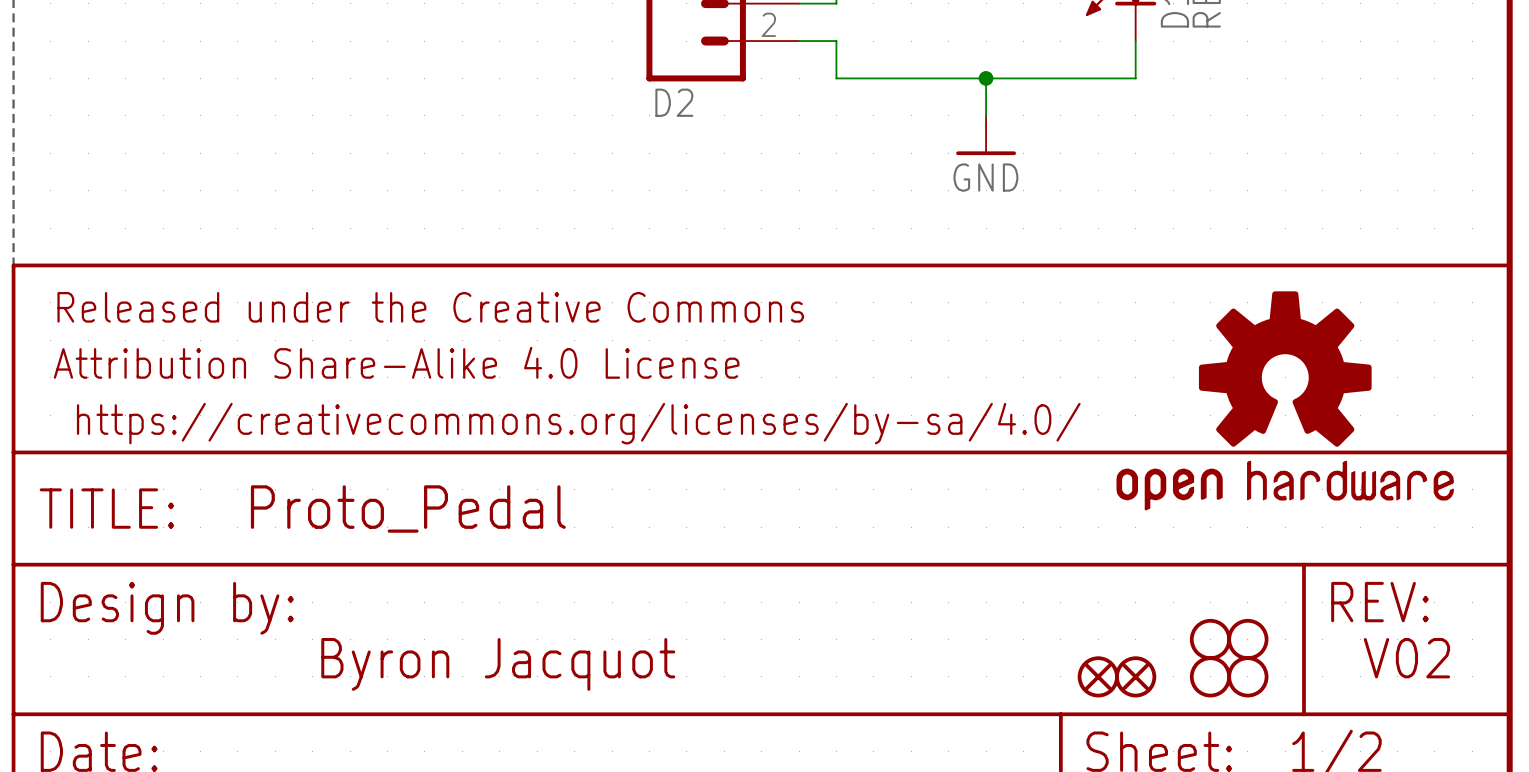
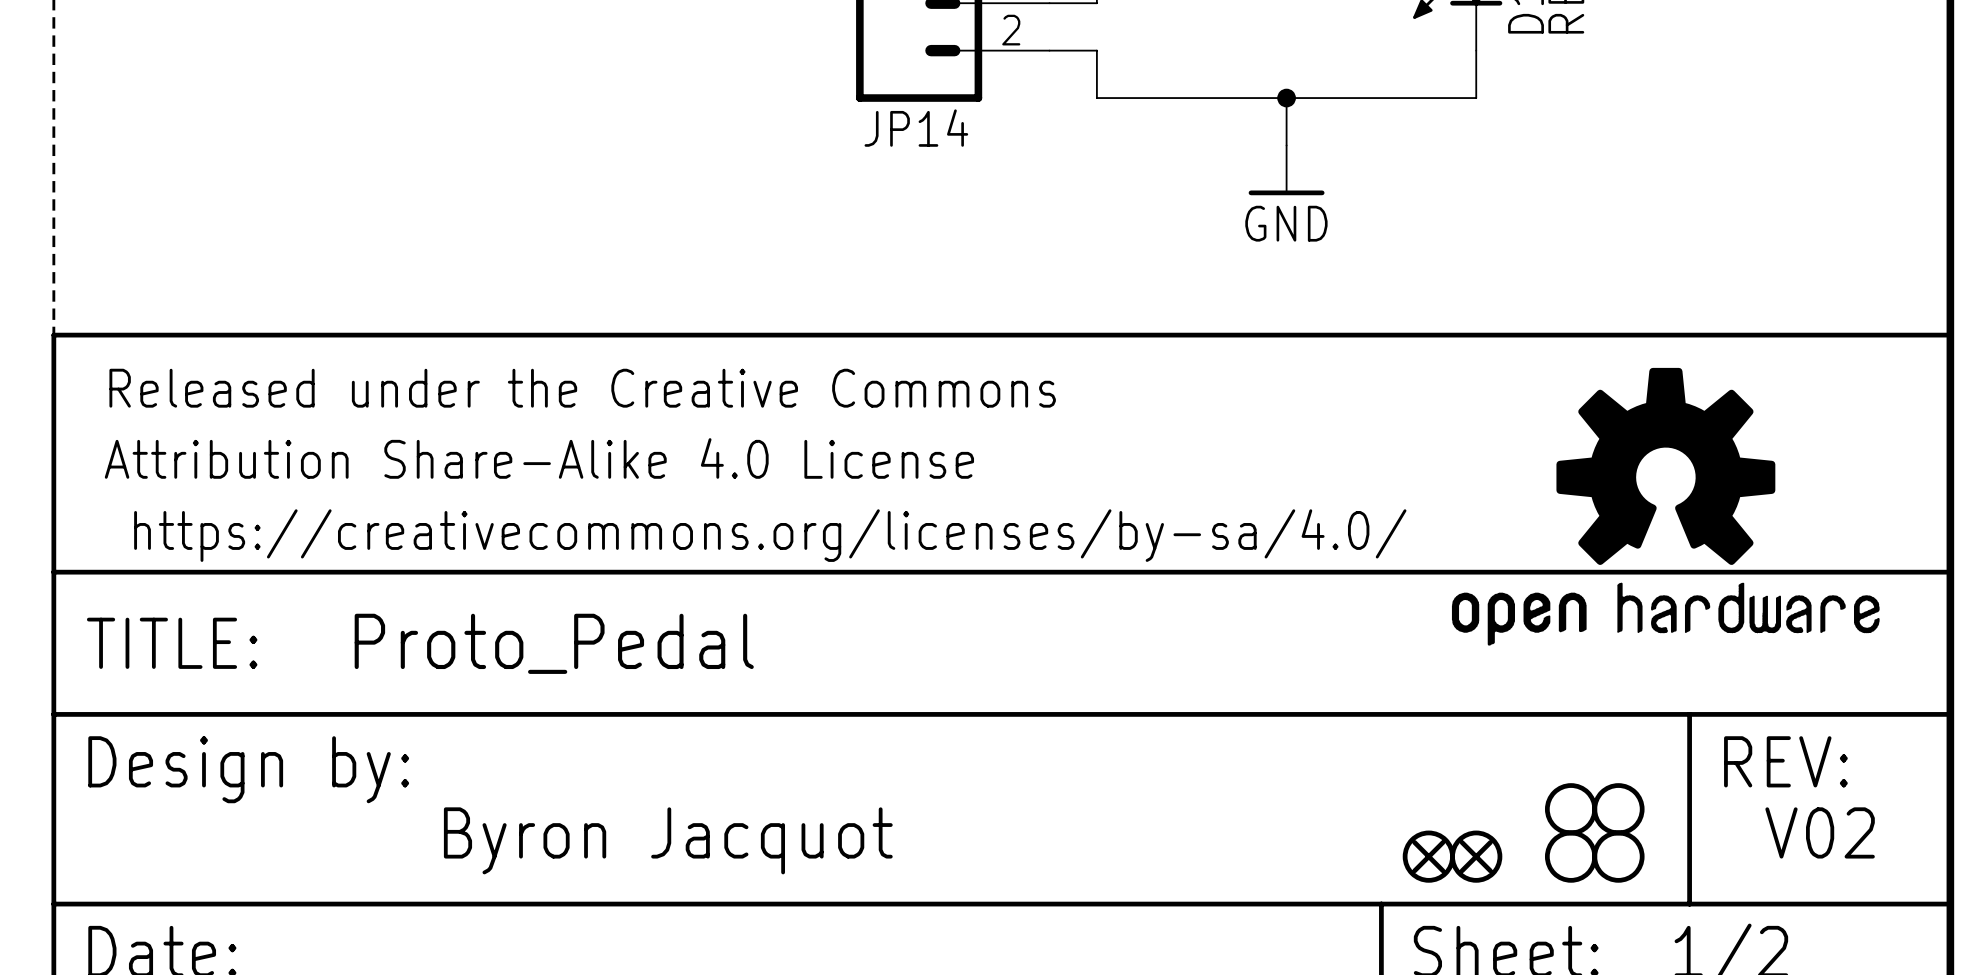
D2 name: D2 (674, 102) -> JP14 (916, 128)

